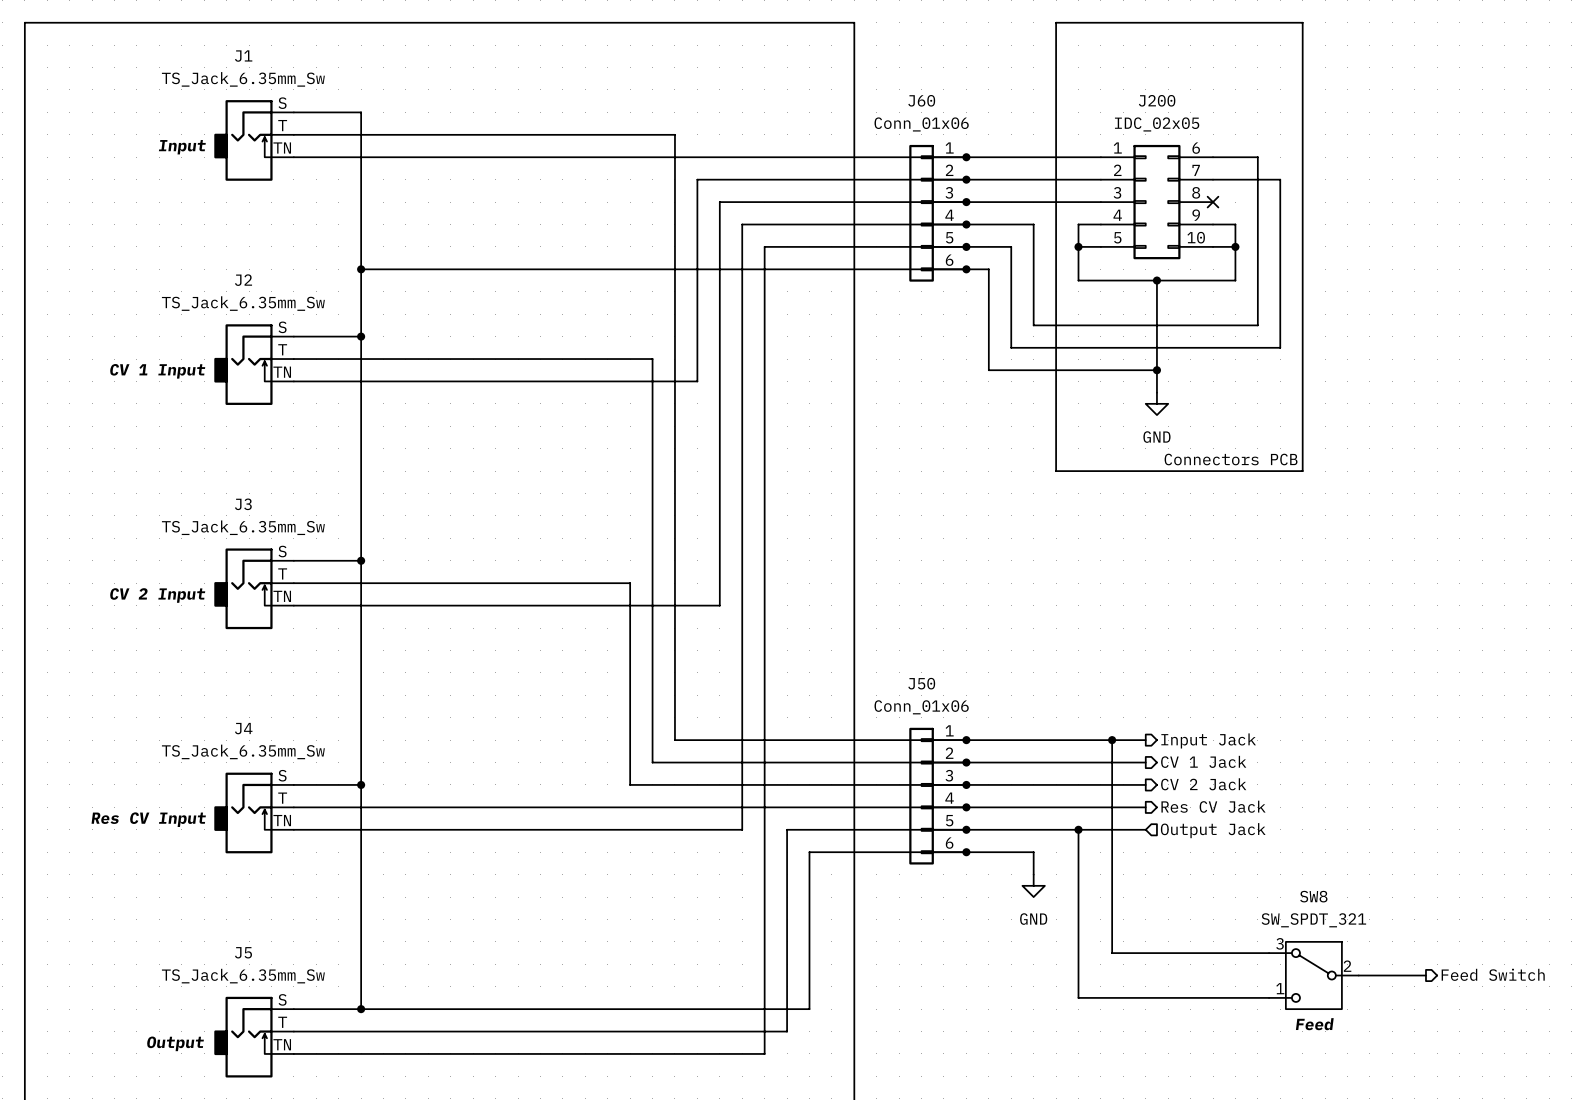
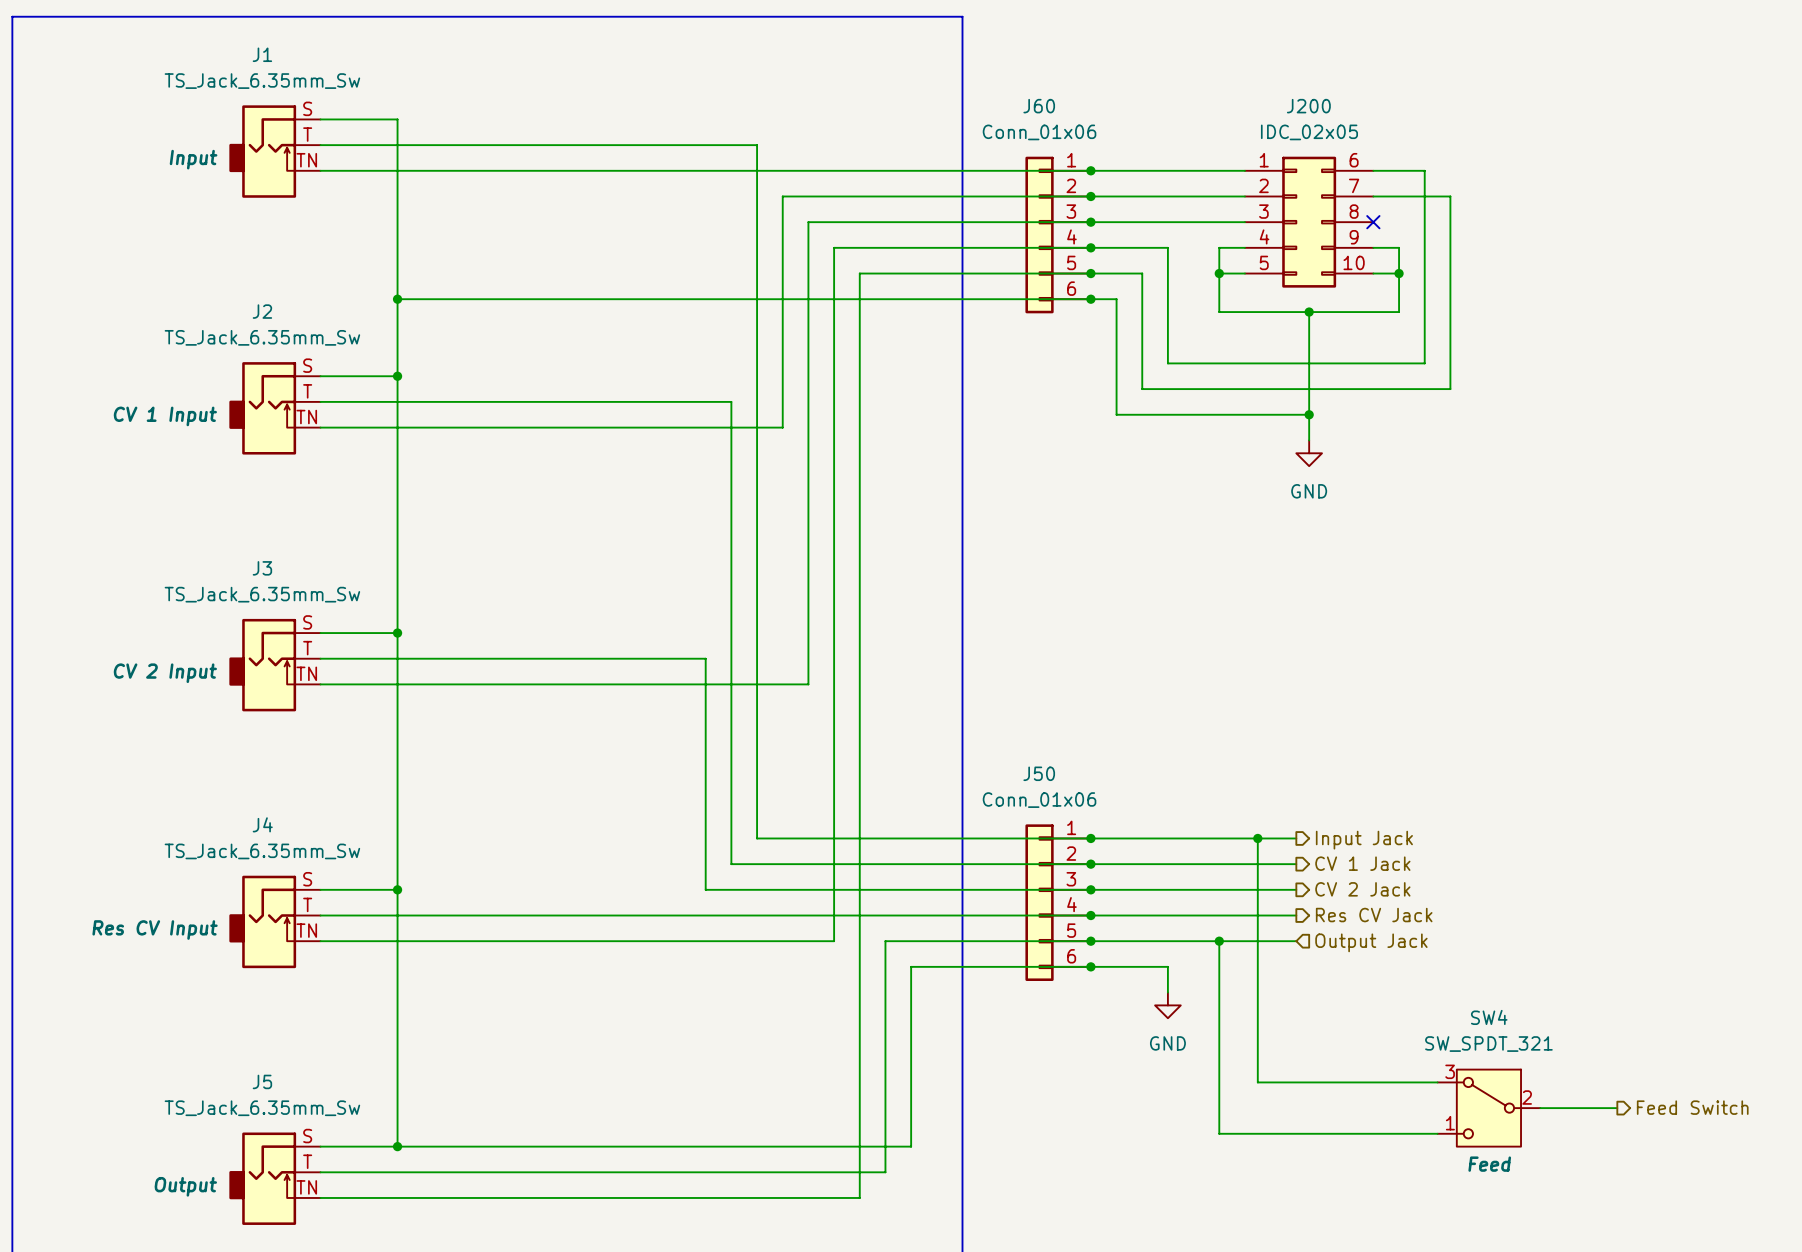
line: (1056, 22) (1302, 22) (1302, 471) (1056, 471) (1056, 22) -> none
text: Connectors PCB (1231, 459) -> none
SW8 name: SW8 (1313, 896) -> SW4 (1489, 1017)

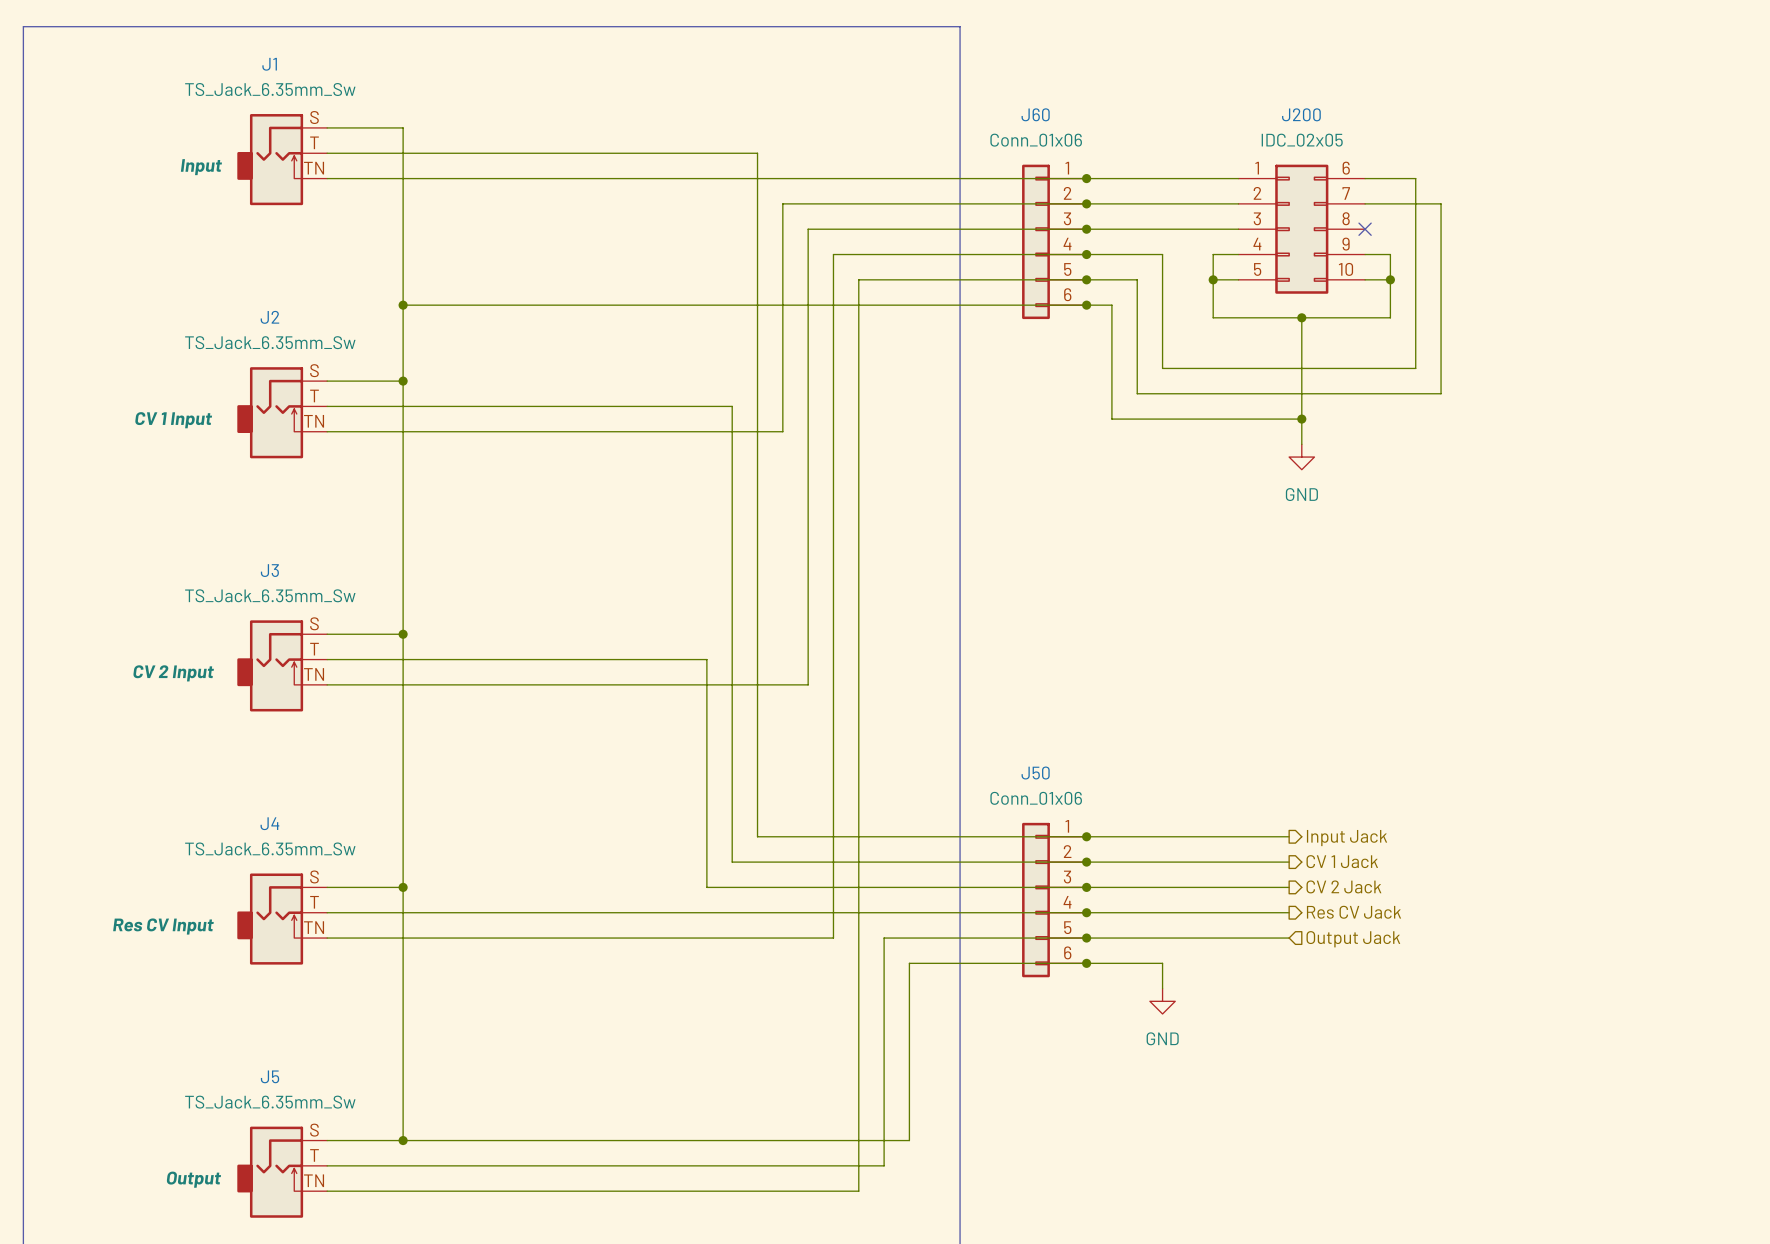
wire: (1257, 838) (1257, 1082) (1437, 1082) -> none
junction: (1257, 838) -> none
wire: (1219, 941) (1219, 1133) (1437, 1133) -> none
junction: (1219, 941) -> none
hierarchical label: Feed Switch (1692, 1107) -> none
SW4: SW_SPDT_321 (1488, 1108) -> none
wire: (1540, 1108) (1617, 1108) -> none

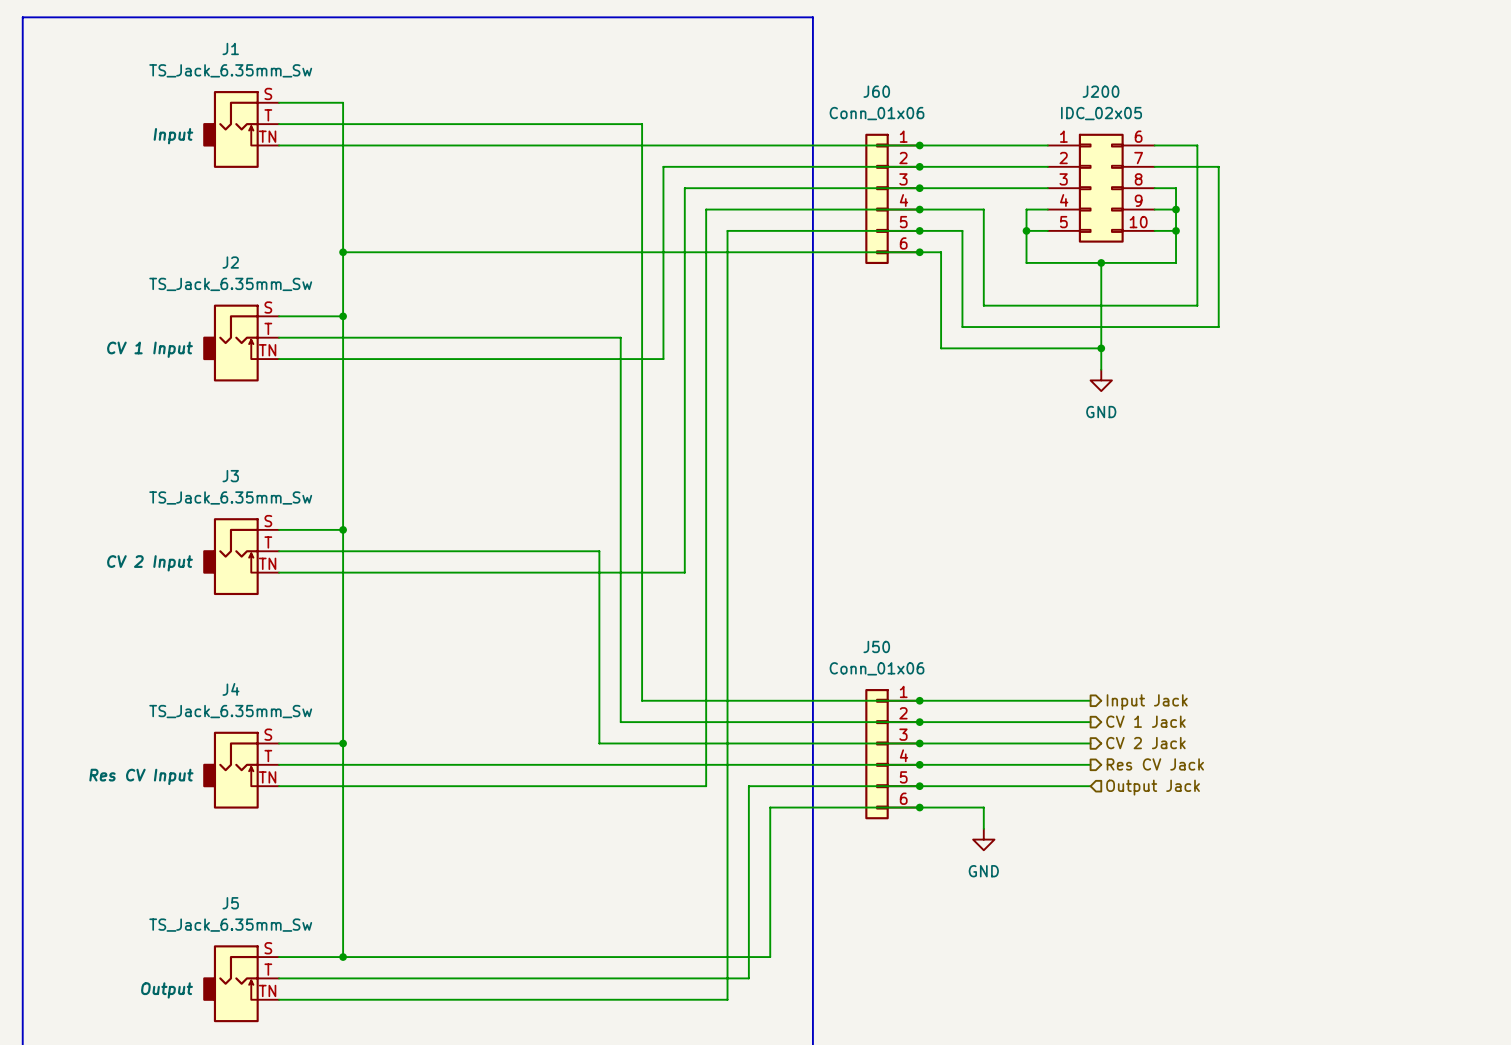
wire: none -> (1154, 188) (1176, 188) (1176, 209)
no-connect mark: (1365, 229) -> none
junction: none -> (1176, 209)

